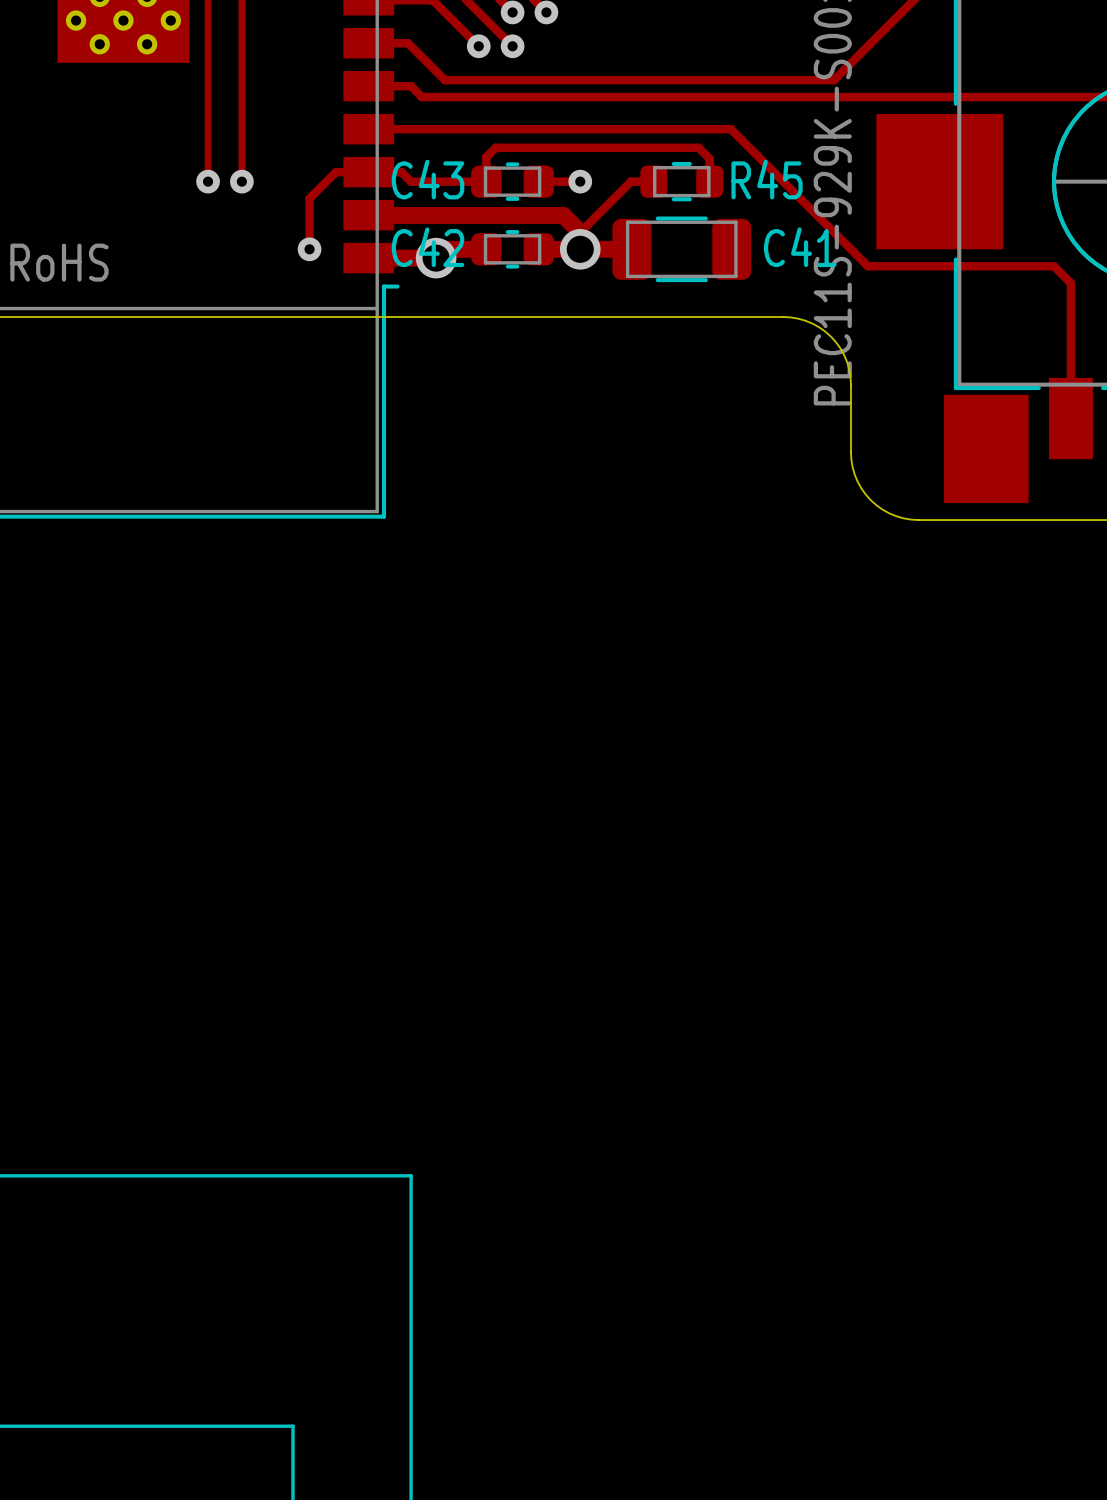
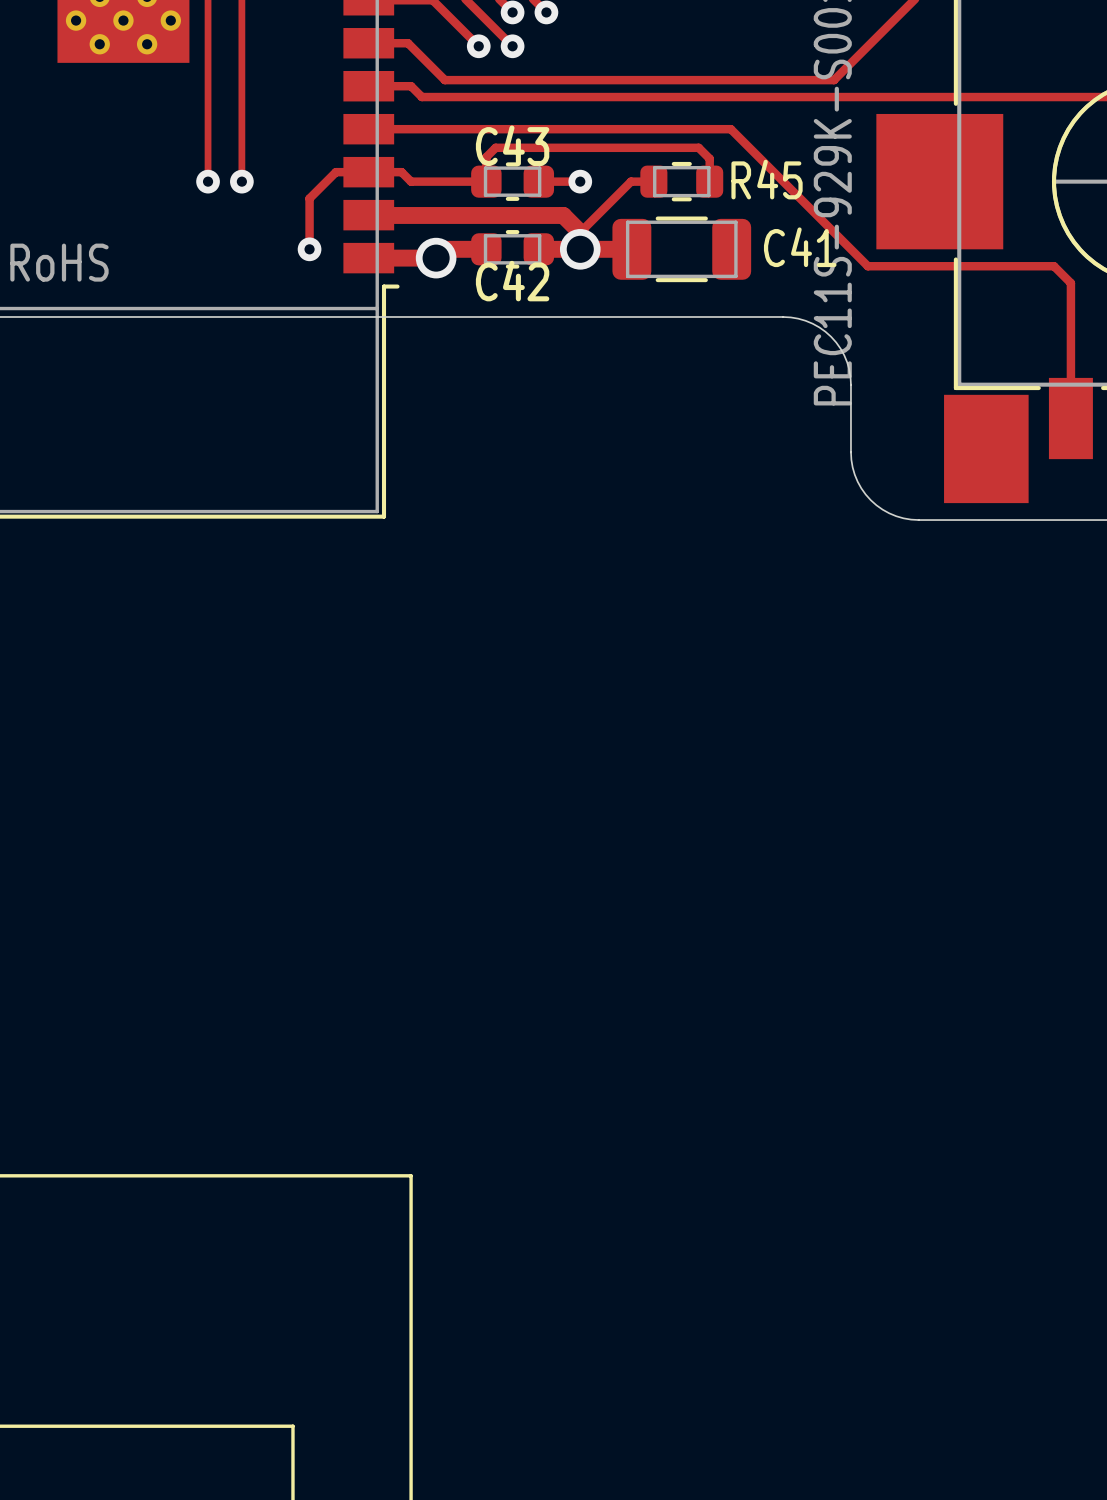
C43 name position: C43 (427, 179) -> C43 (512, 145)
C42 name position: C42 (427, 247) -> C42 (512, 281)

